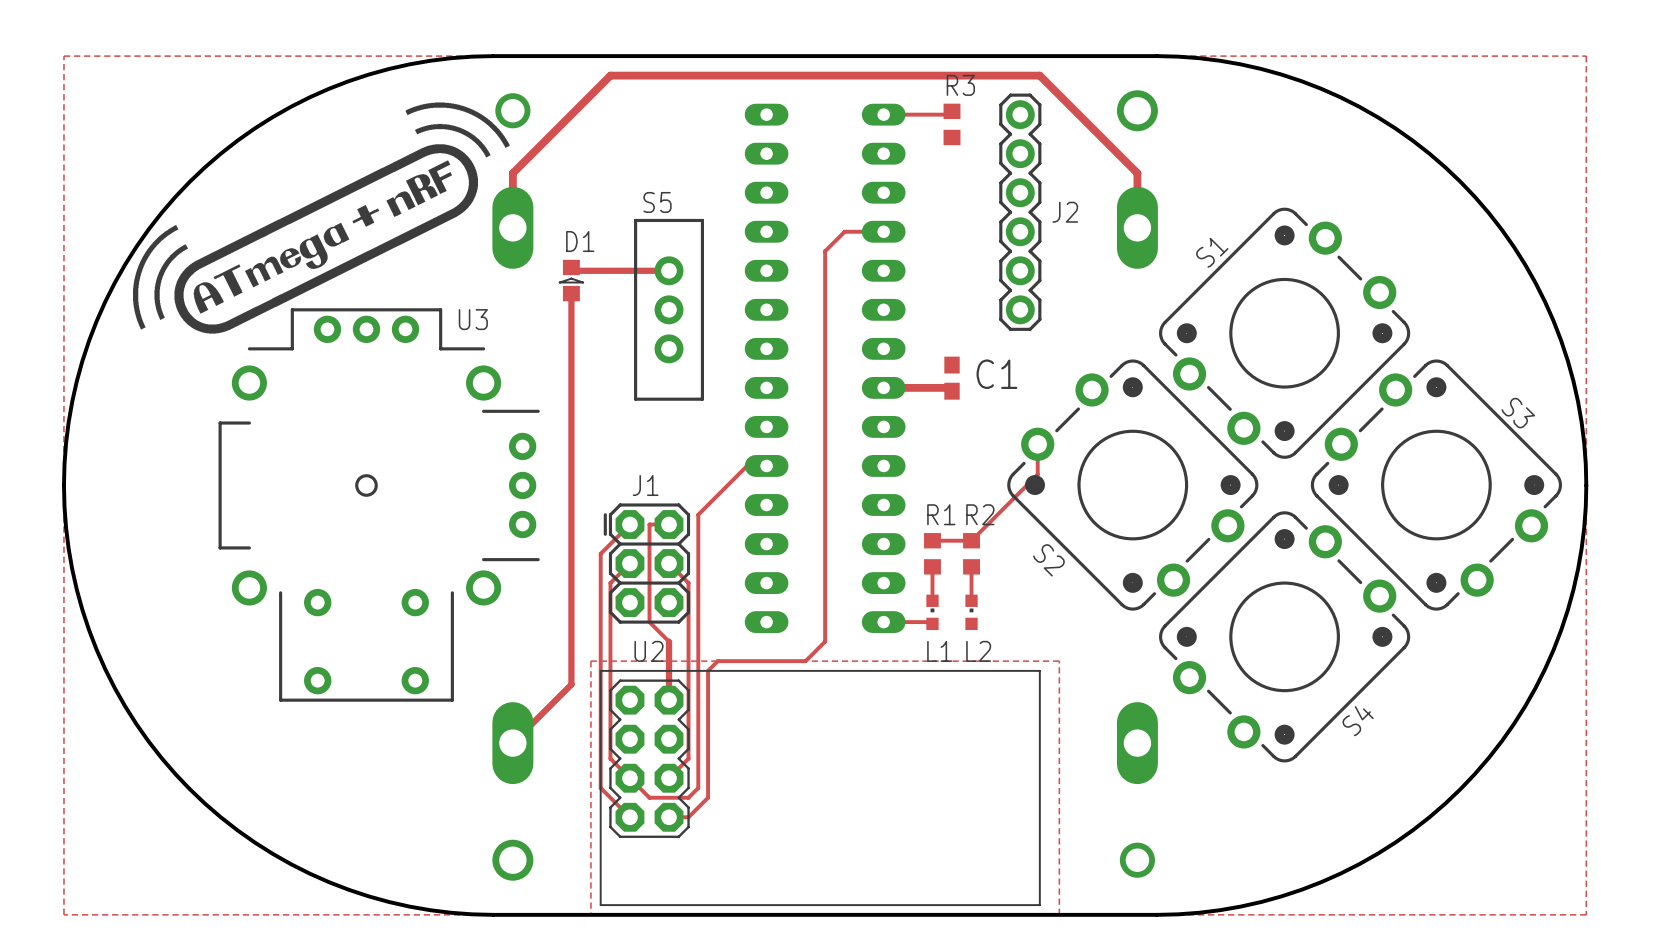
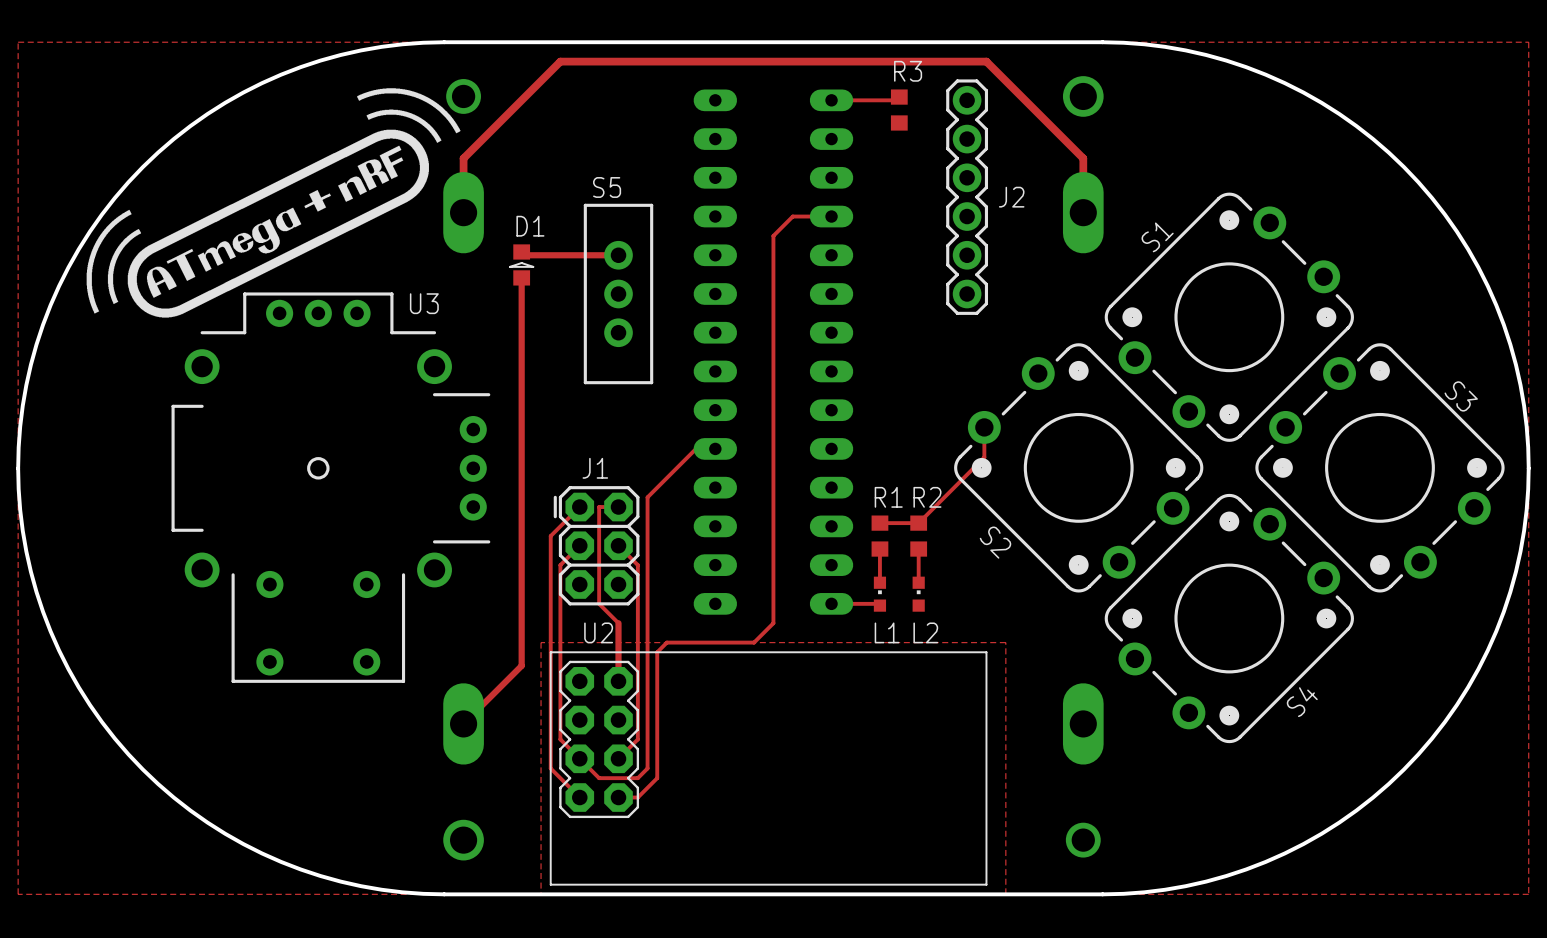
text: C1 (996, 374) -> none
part: (952, 378) -> none
track: (883, 387) (952, 387) (952, 391) -> none

